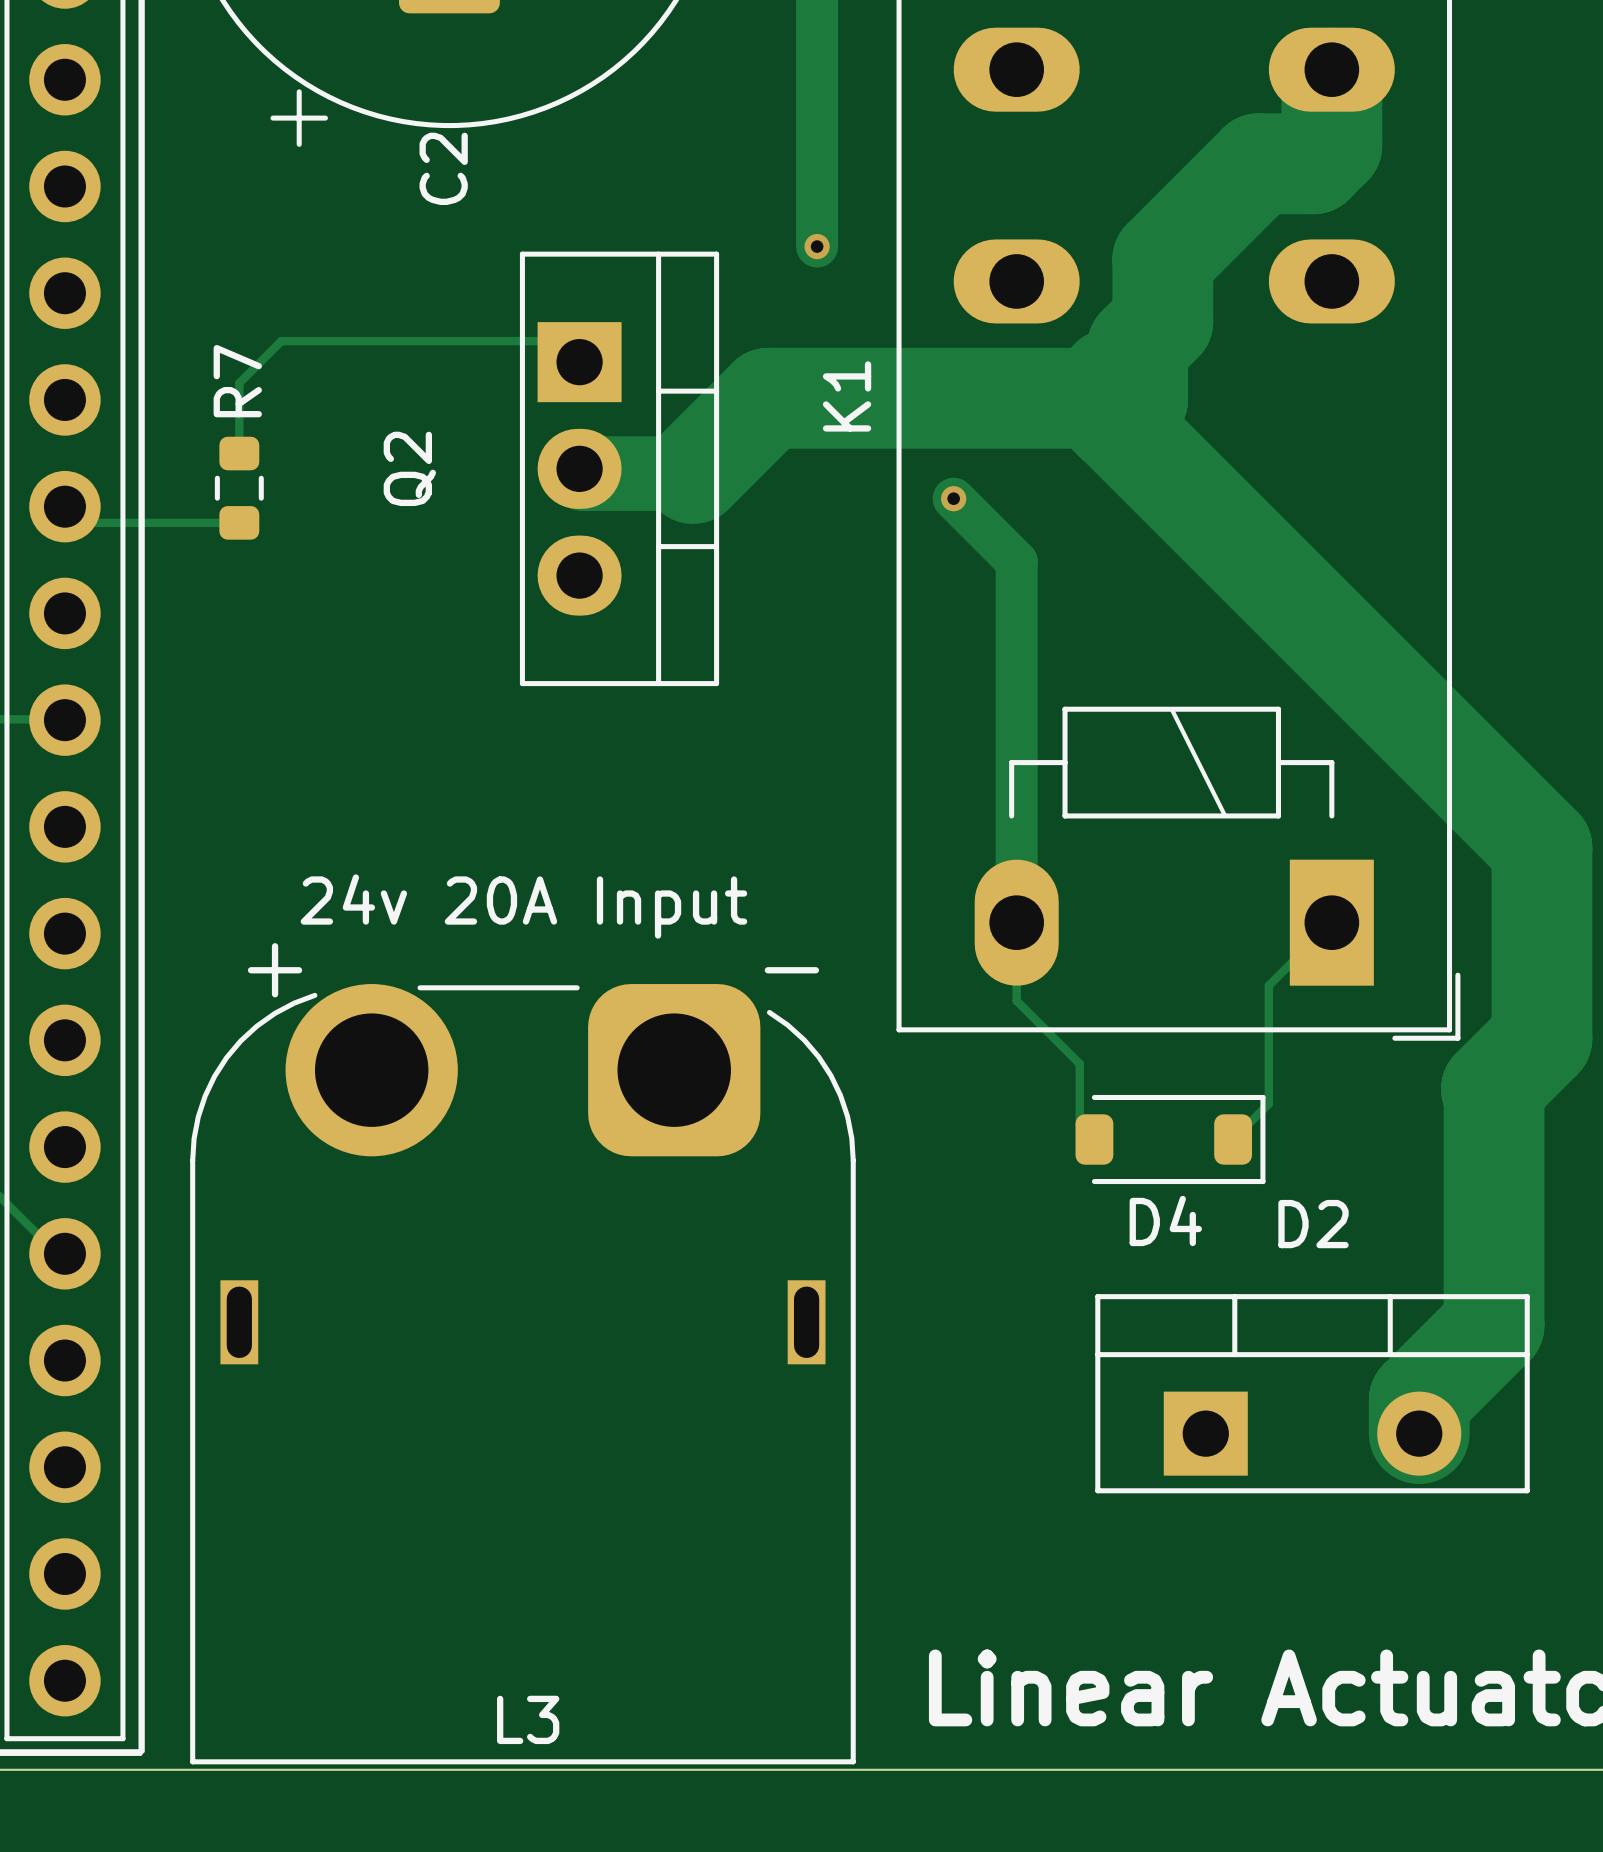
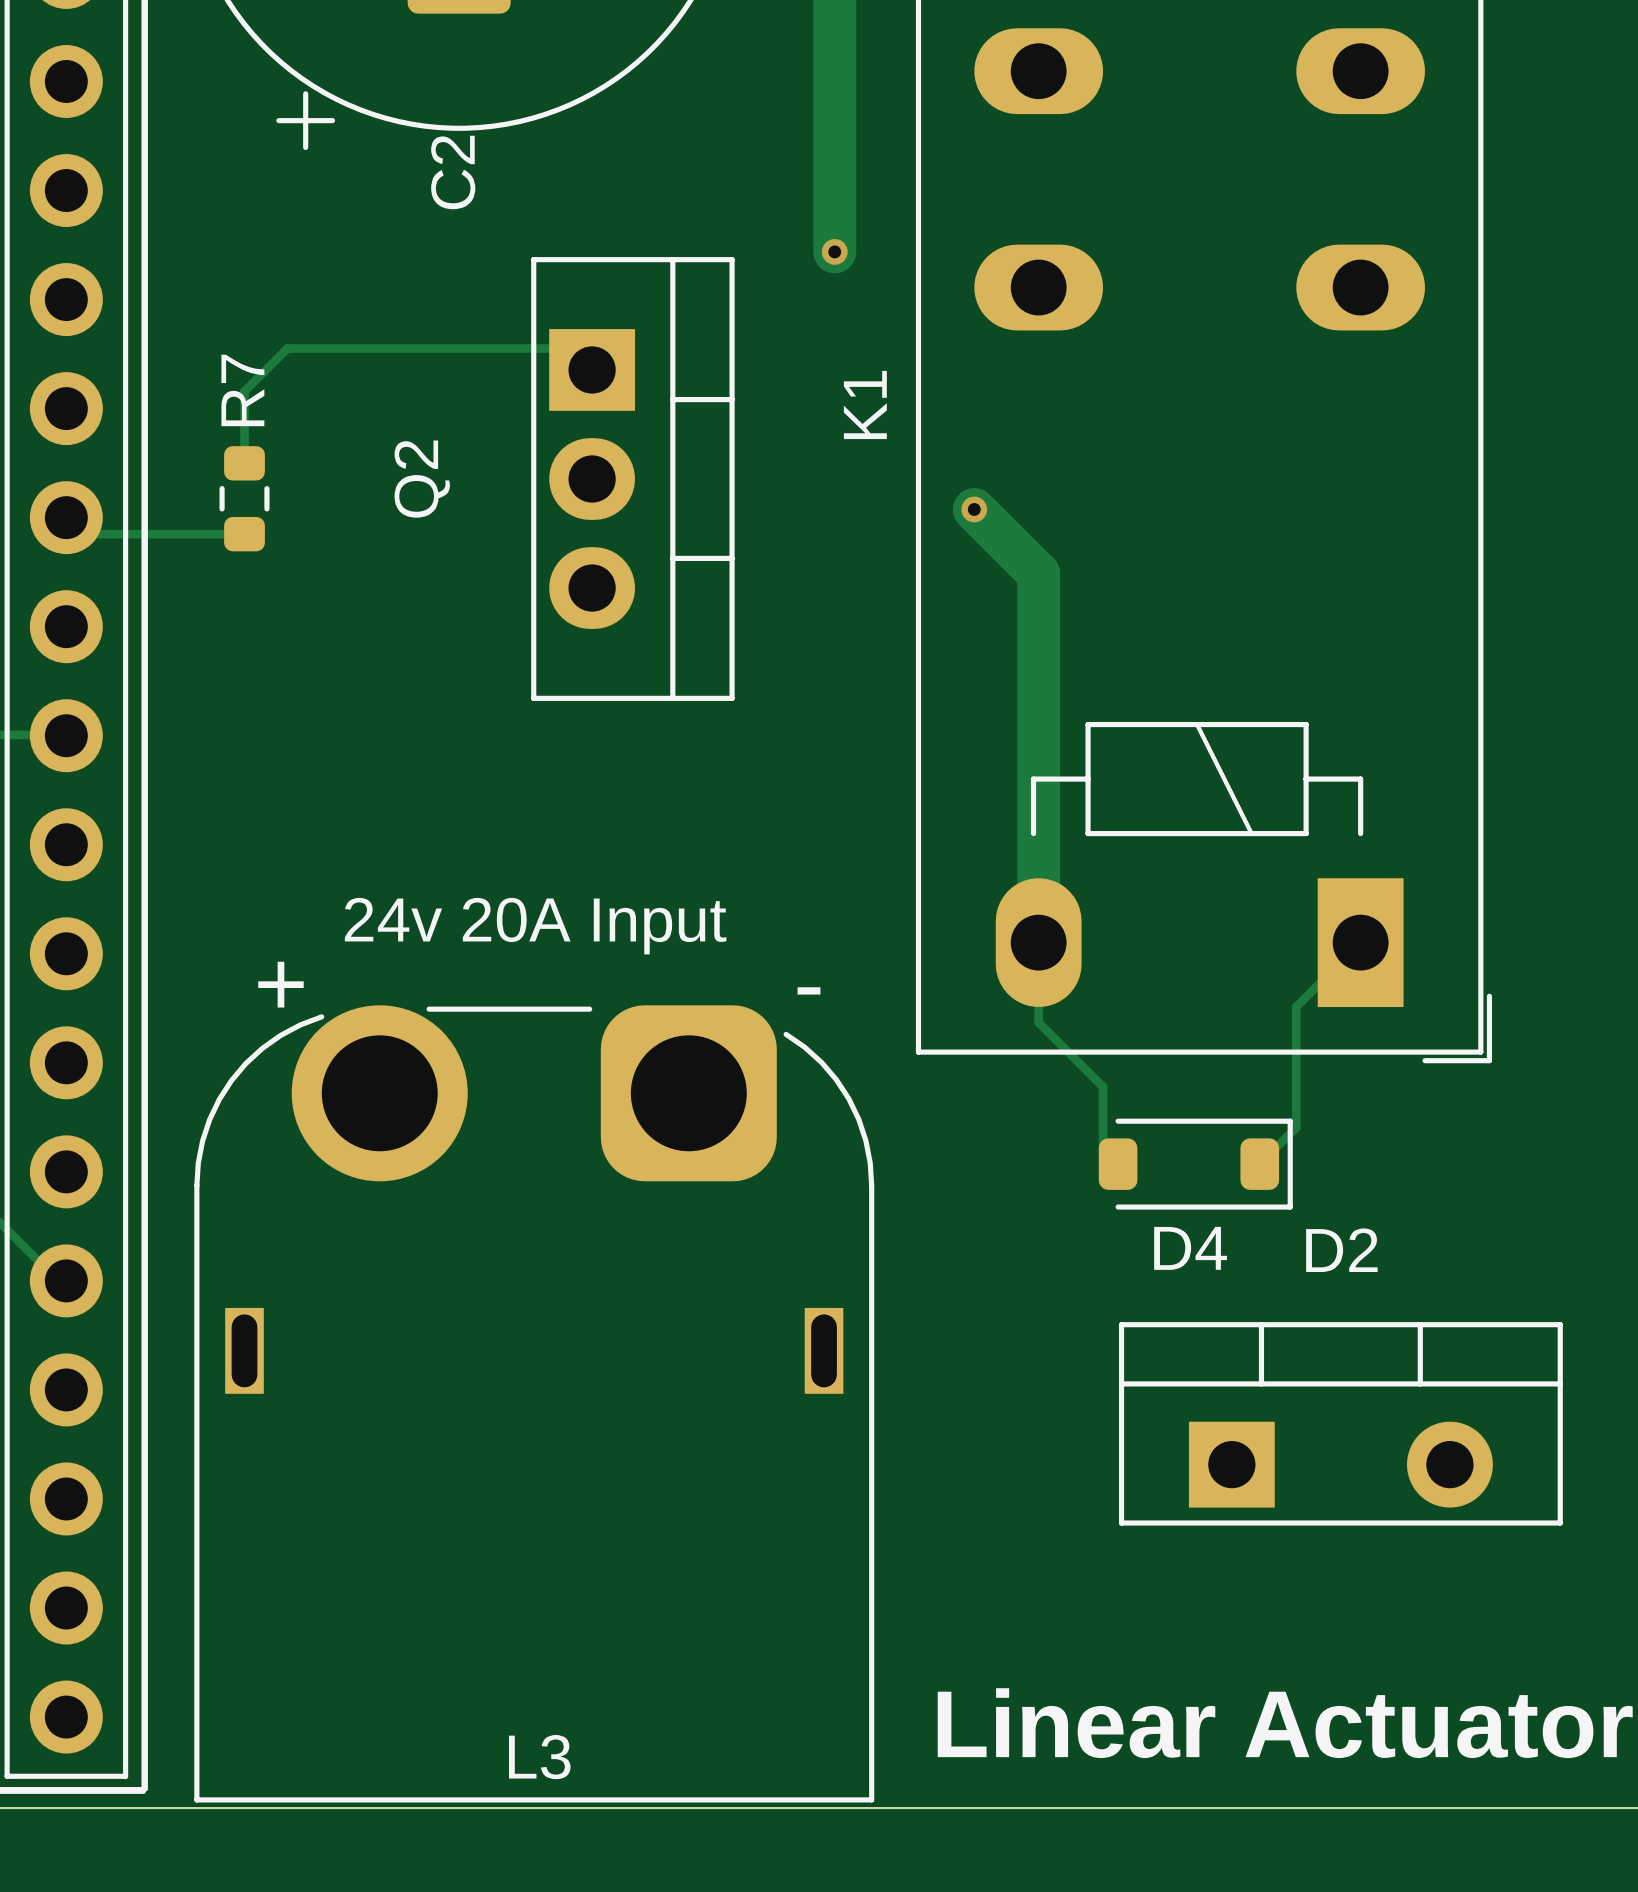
track: (1331, 78) (1331, 145) (1313, 163) (1258, 163) (1162, 259) (1162, 321) (1137, 346) (1137, 399) (1115, 421) -> none
track: (1110, 378) (1110, 416) (1541, 847) (1541, 1038) (1491, 1089) (1494, 1091) (1494, 1325) (1419, 1400) (1419, 1433) -> none
track: (1110, 399) (768, 398) (693, 473) (584, 473) (579, 468) -> none

